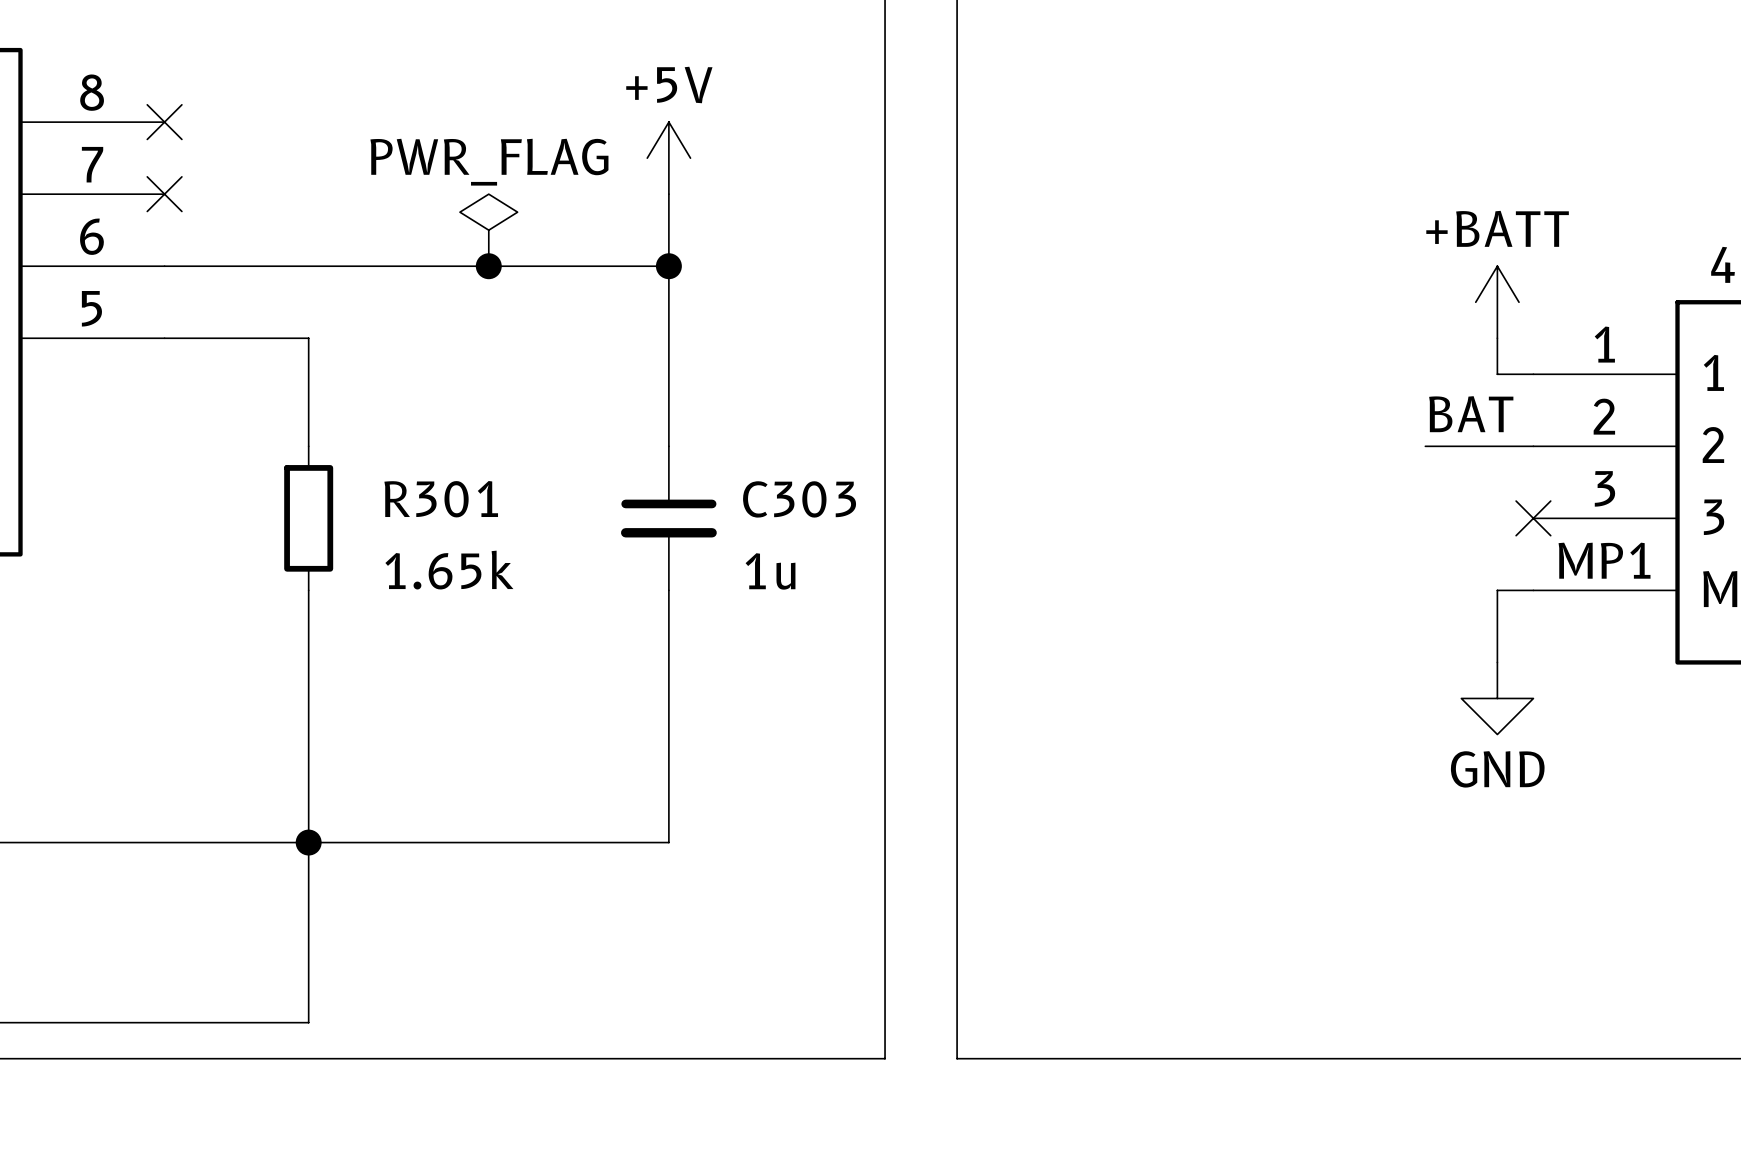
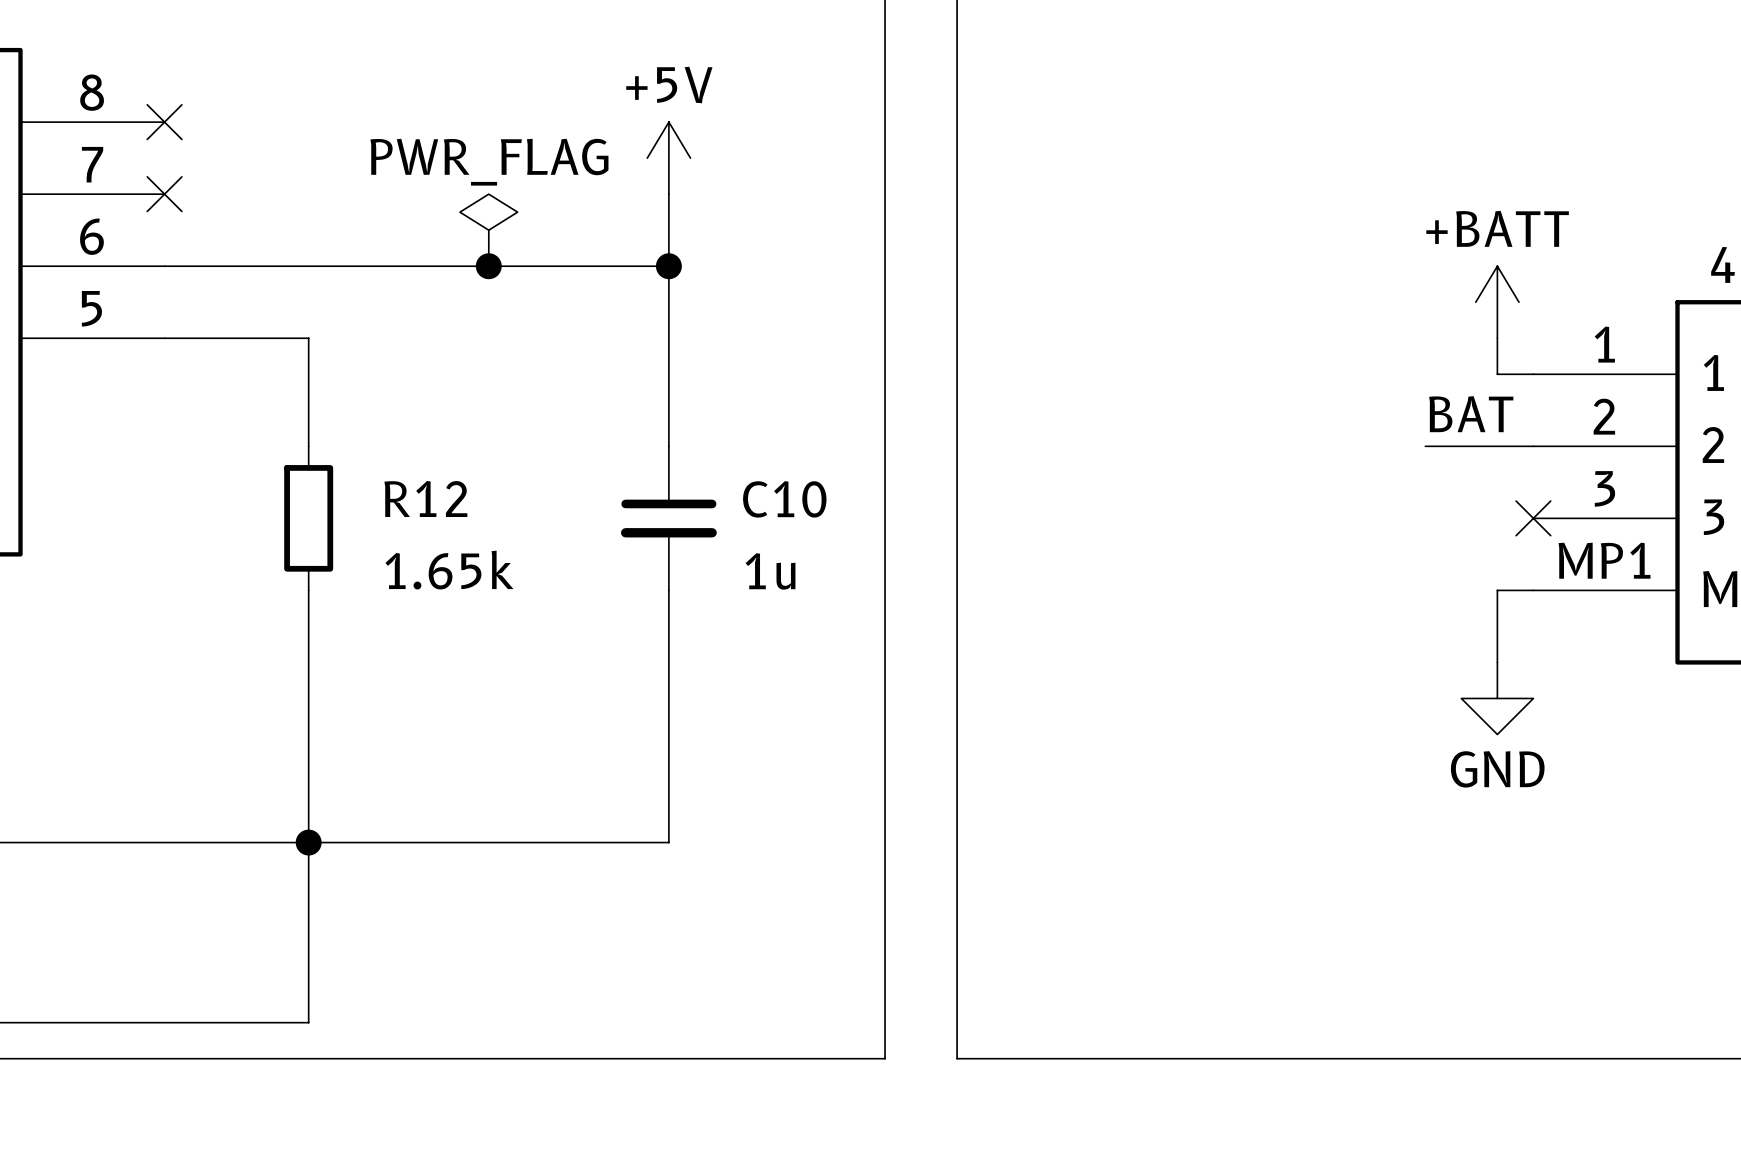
R301 name: R301 (441, 499) -> R12 (425, 499)
C303 name: C303 (799, 499) -> C10 (784, 499)

